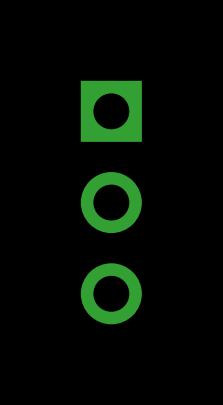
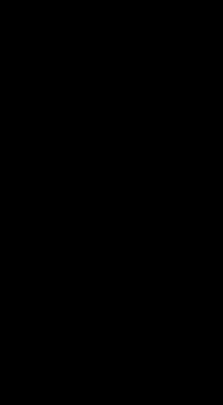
part: (111, 202) -> none

